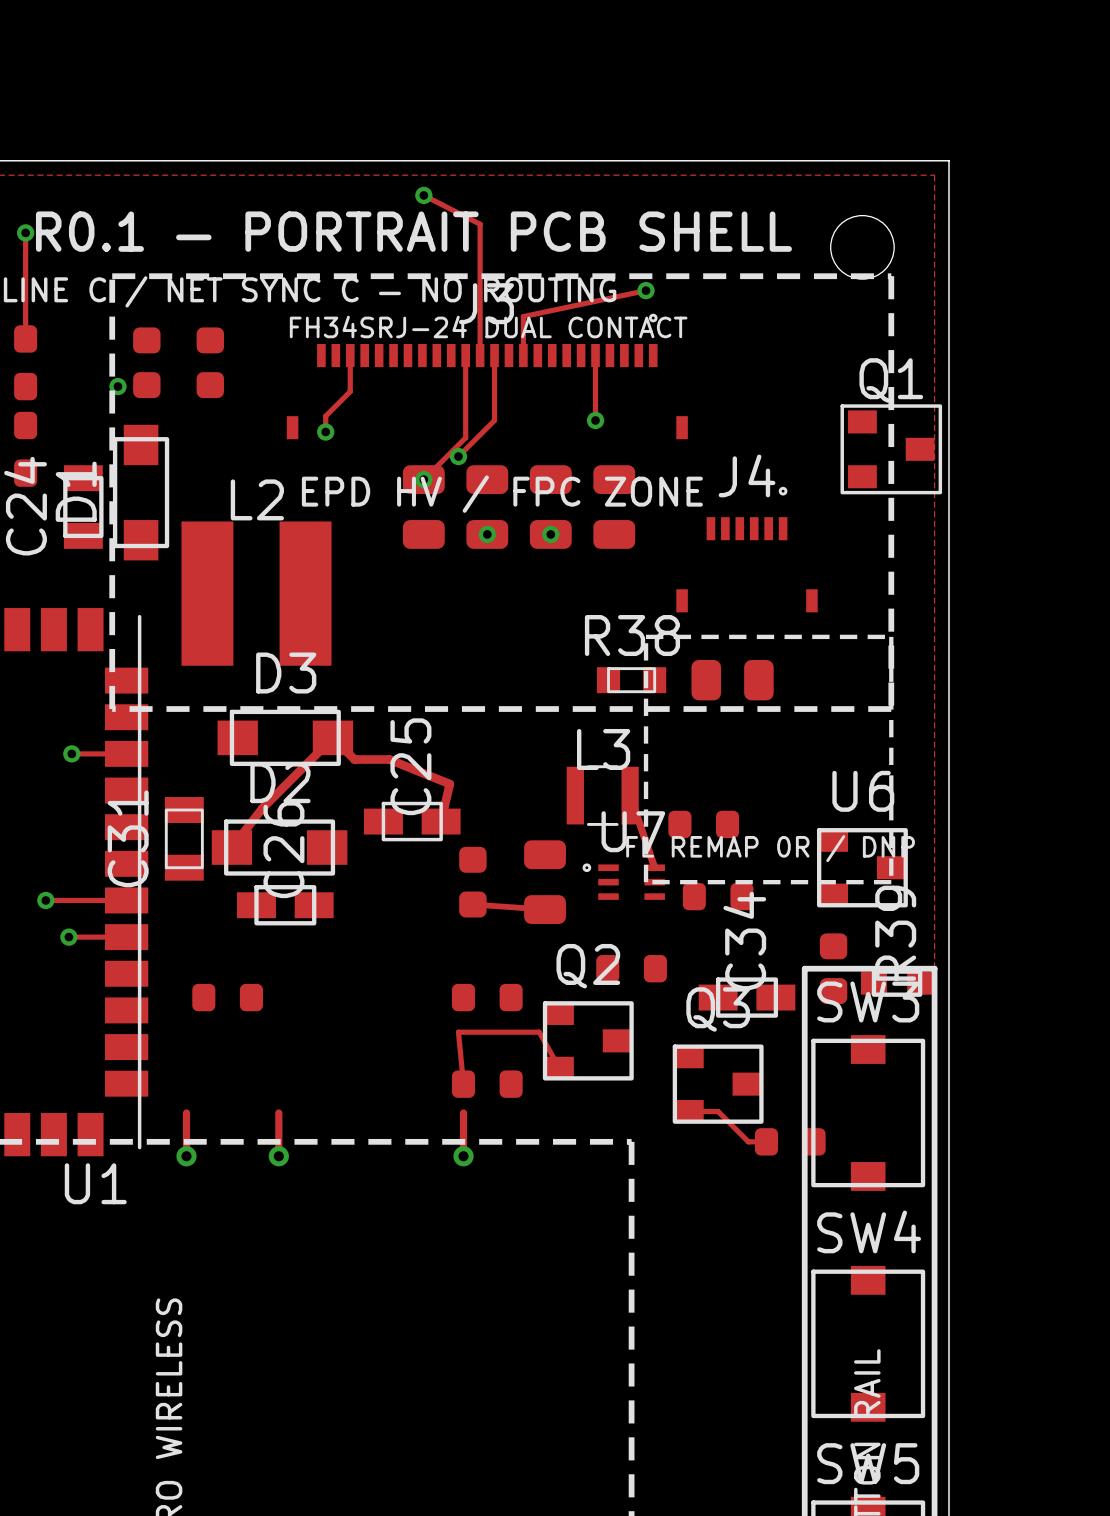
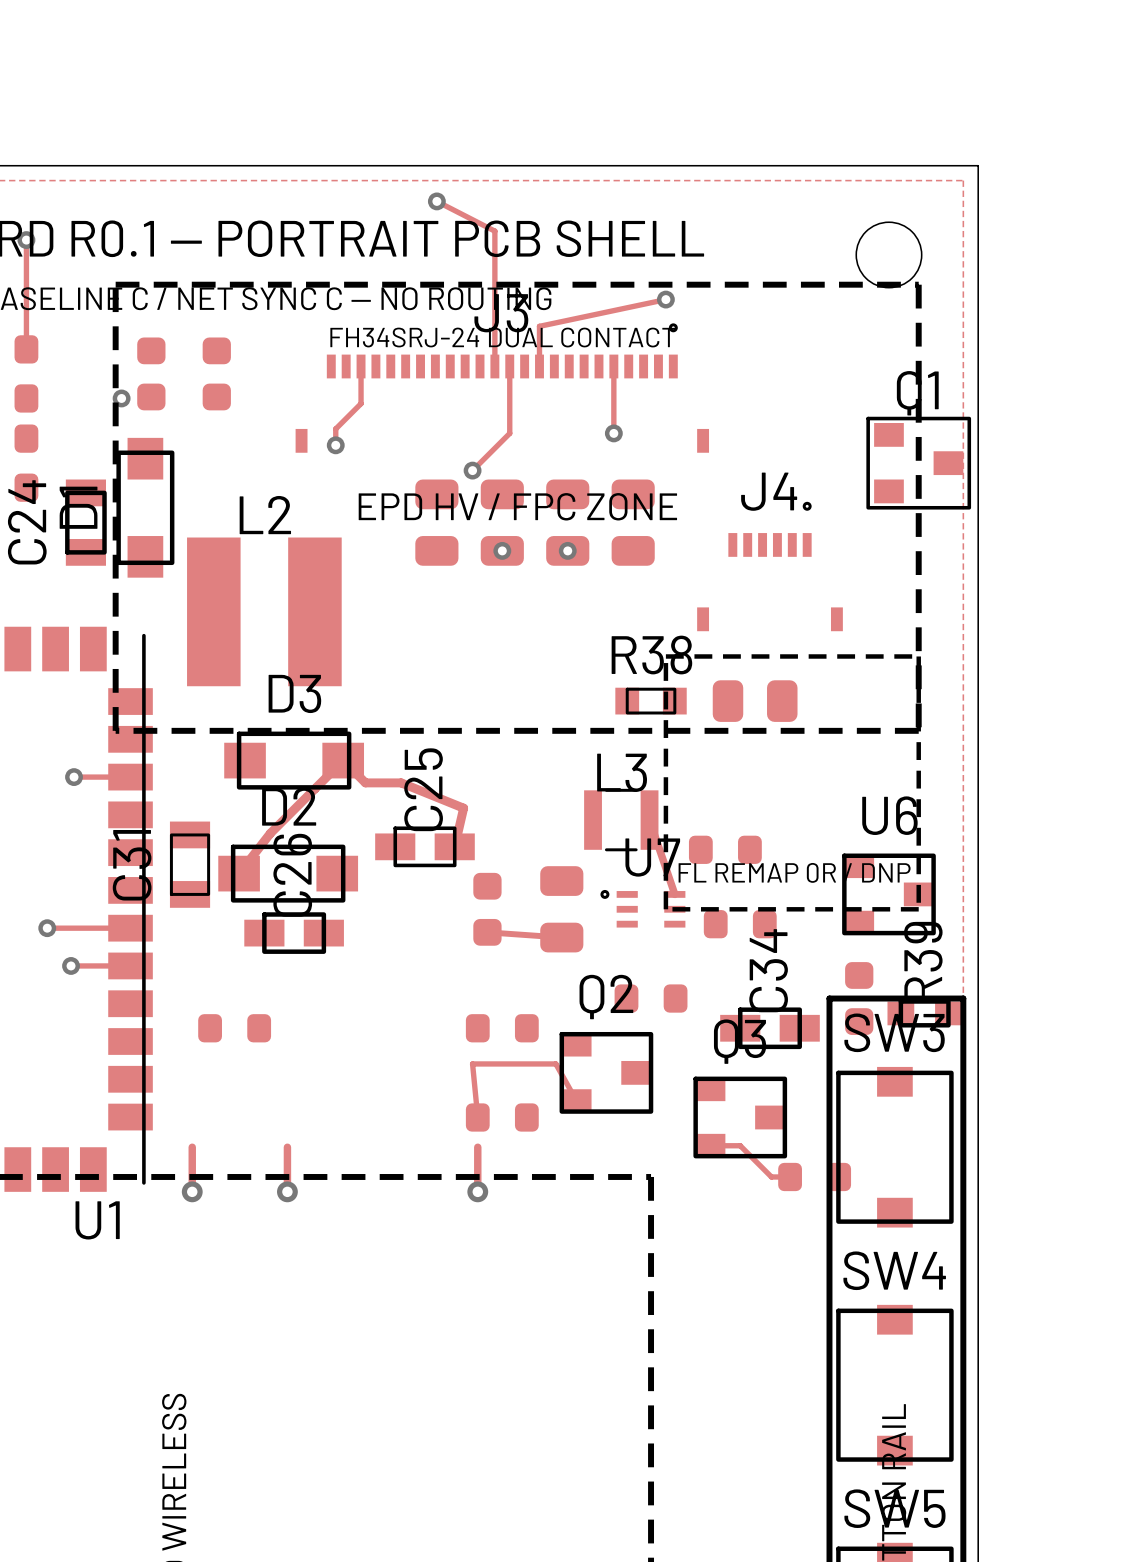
track: (465, 355) (465, 437) (423, 479) -> none
via: (423, 479) -> none

